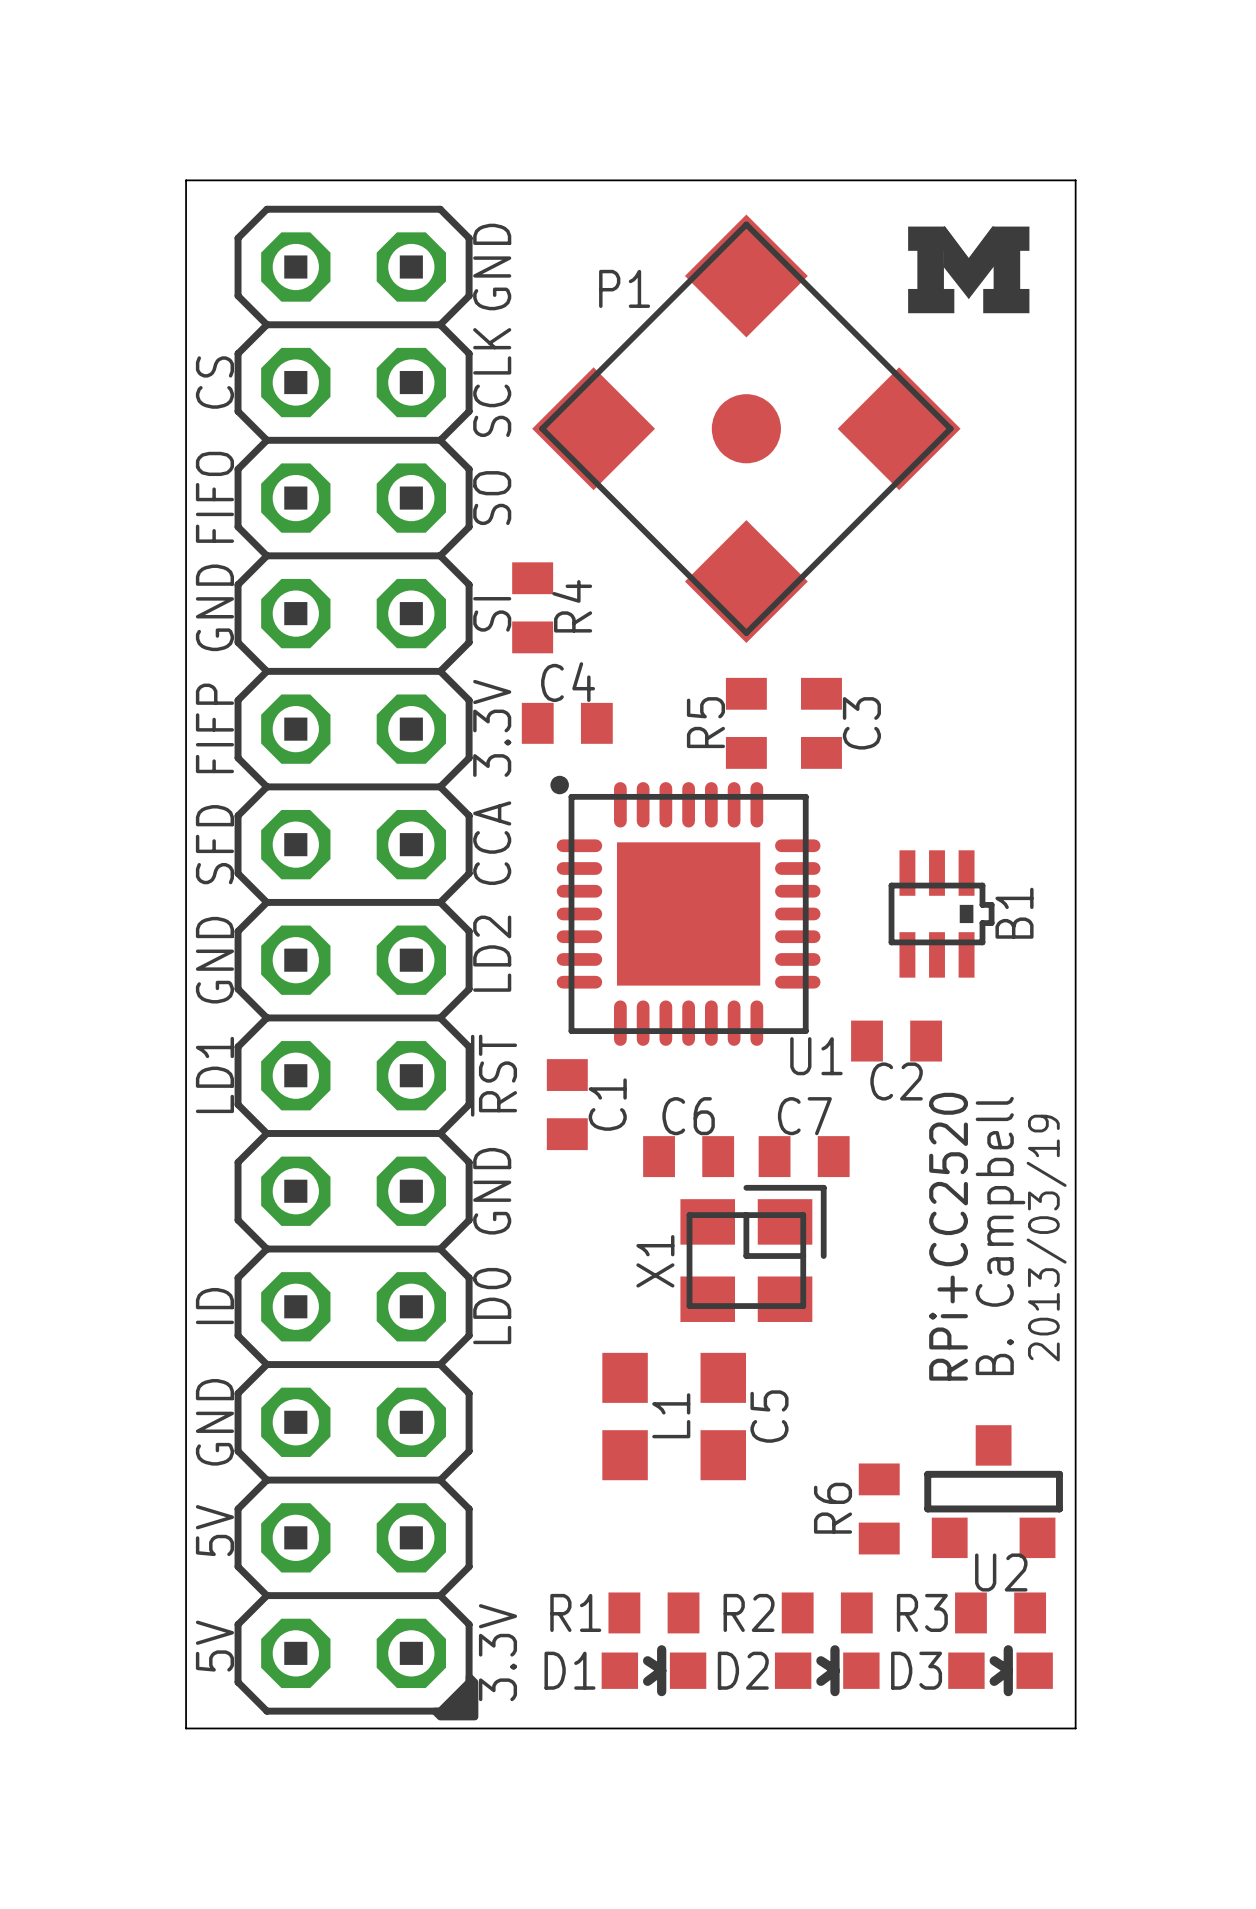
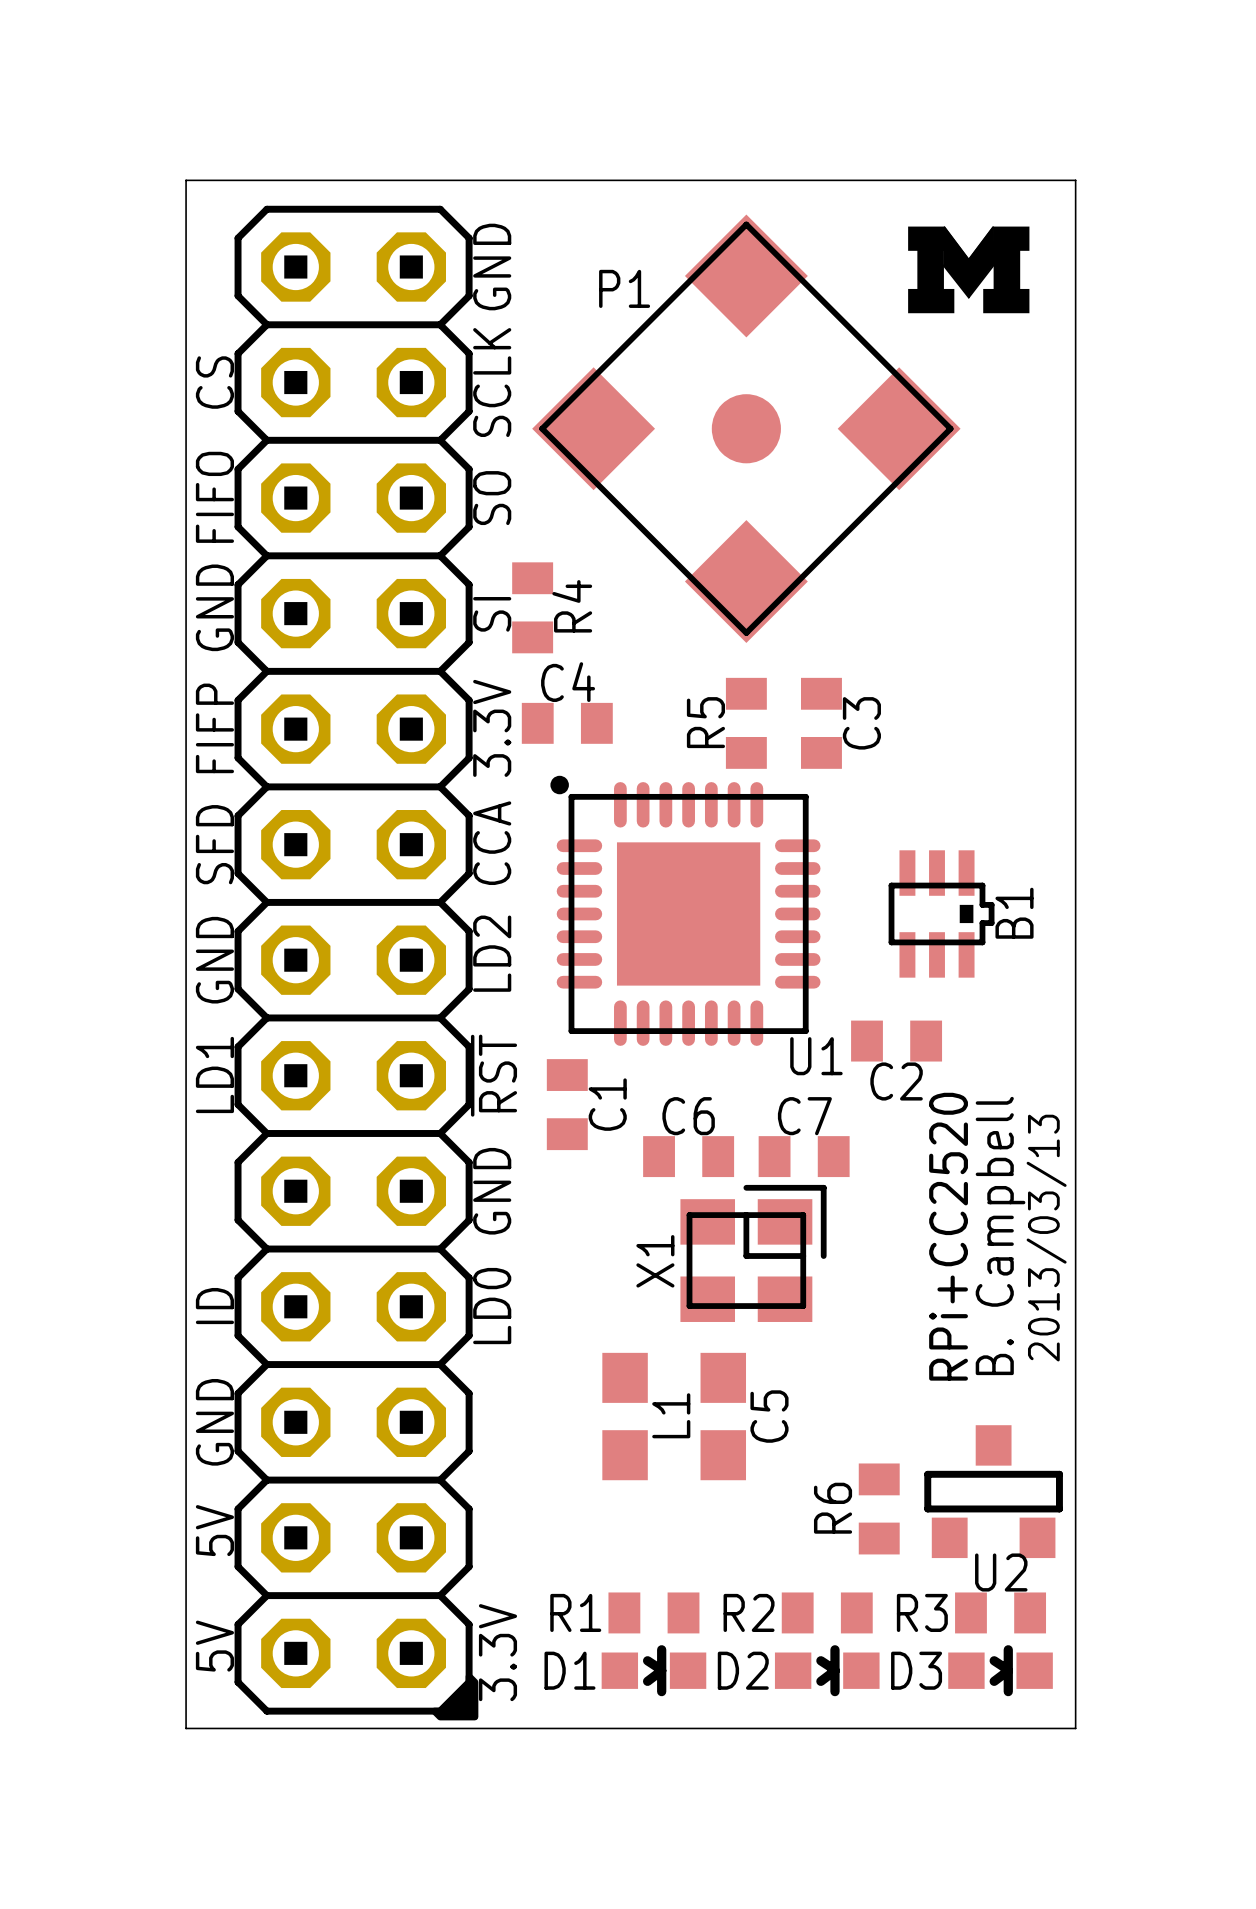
text: 2013/03/19 (1046, 1238) -> 2013/03/13 (1046, 1238)

